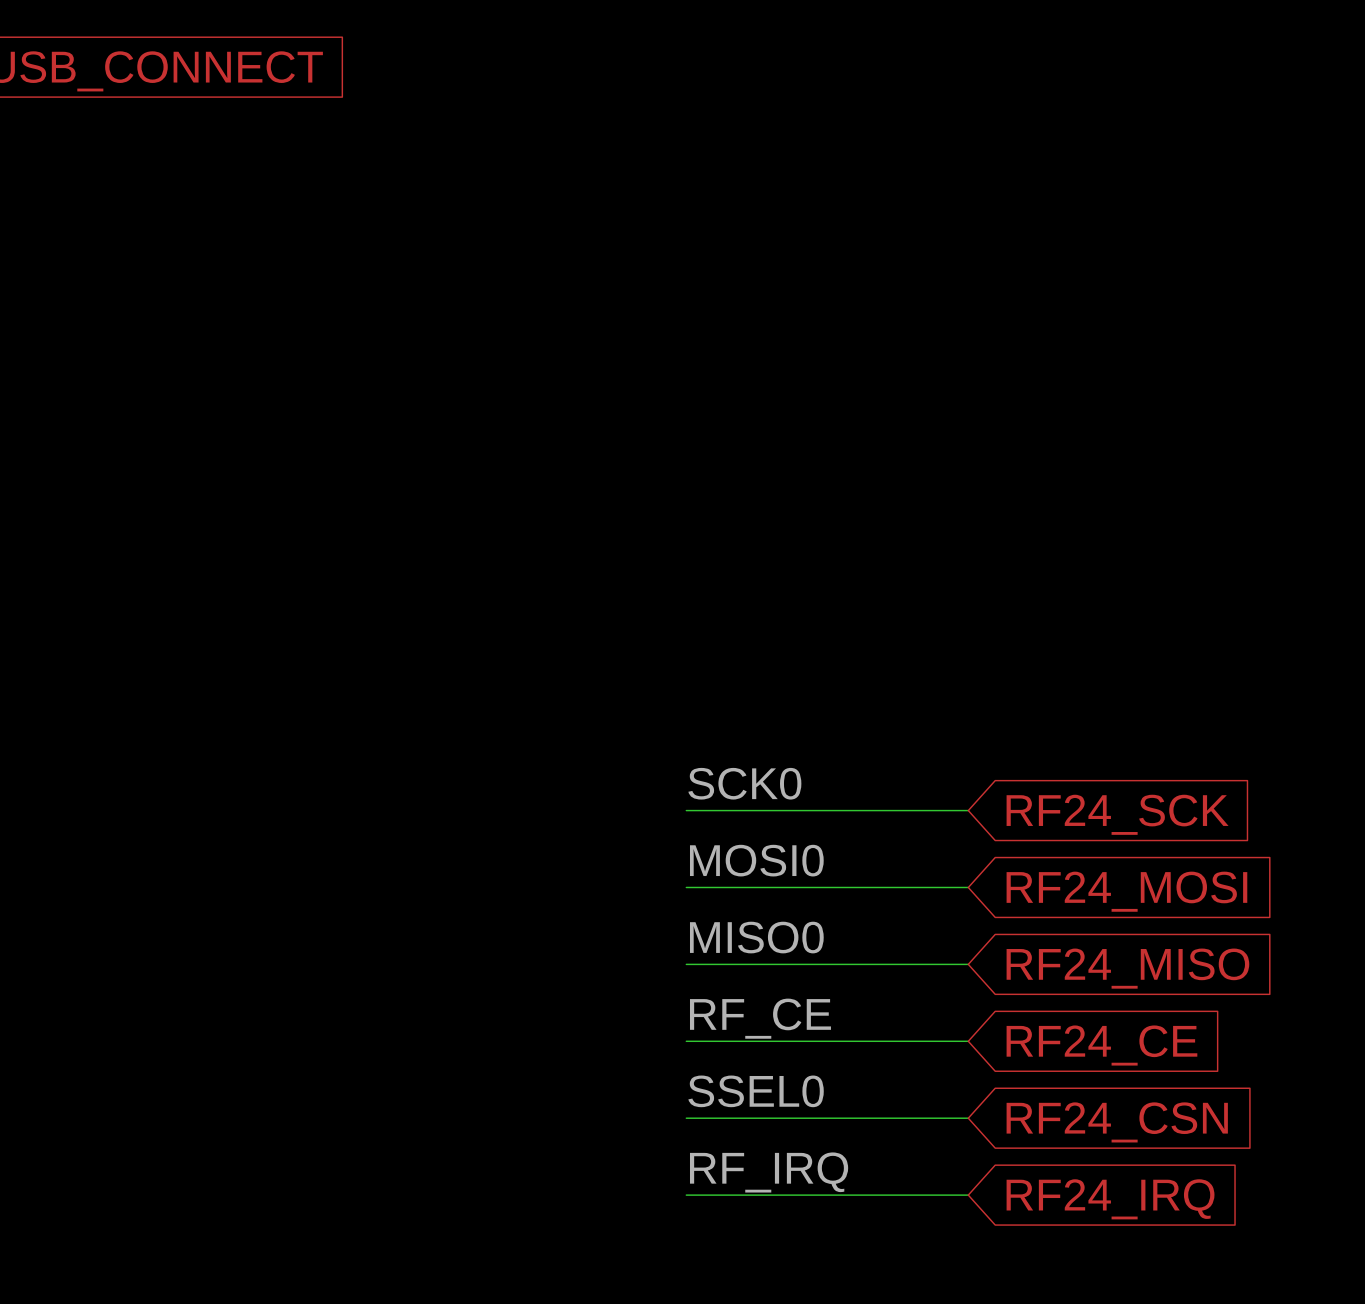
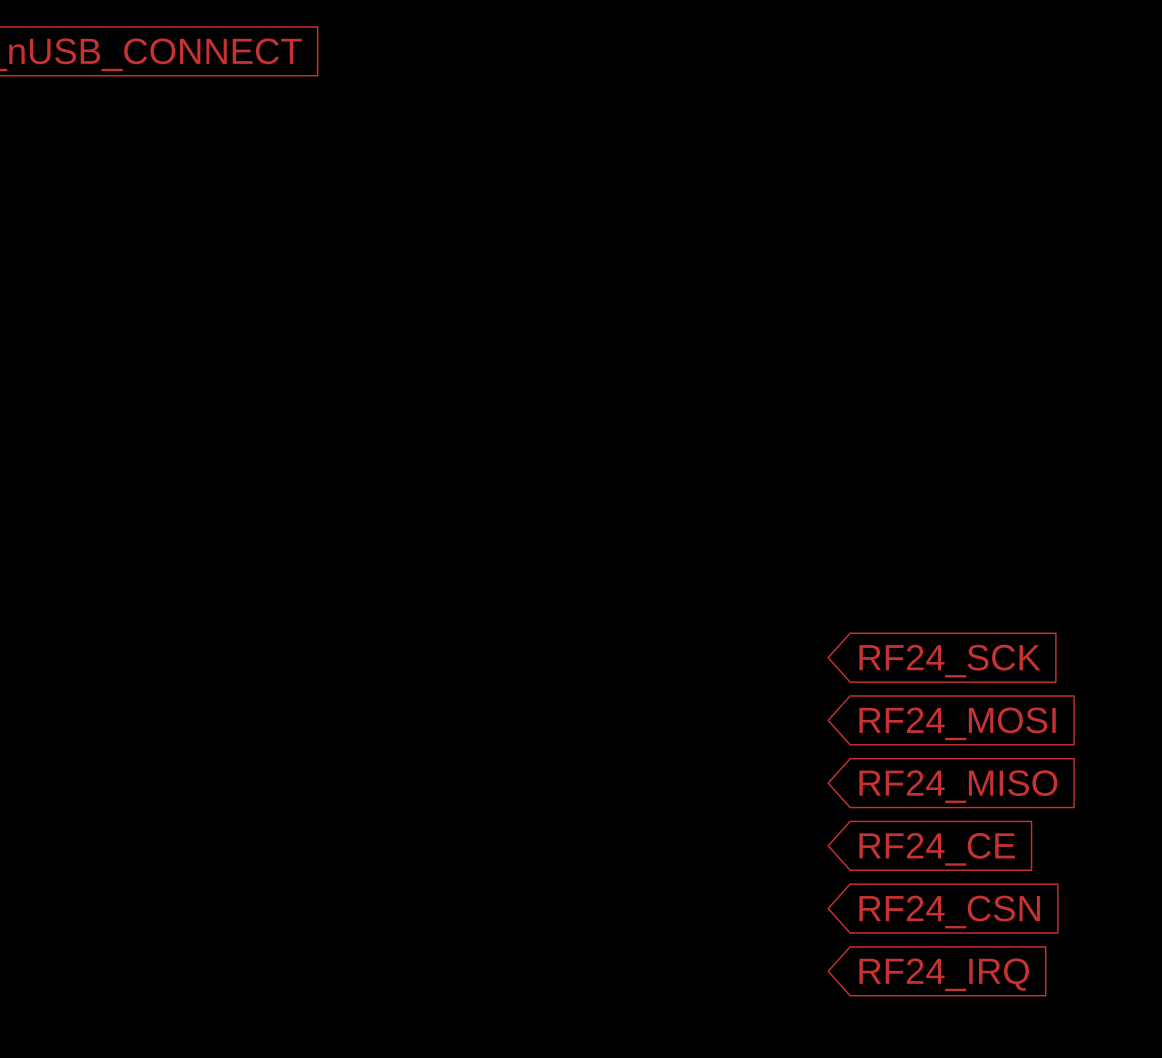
label: SCK0 (744, 783) -> none
wire: (686, 810) (968, 810) -> none
label: MOSI0 (756, 860) -> none
wire: (686, 887) (968, 887) -> none
label: MISO0 (756, 937) -> none
wire: (686, 964) (968, 964) -> none
label: RF_CE (760, 1018) -> none
wire: (686, 1041) (968, 1041) -> none
label: SSEL0 (756, 1091) -> none
wire: (686, 1118) (968, 1118) -> none
label: RF_IRQ (769, 1172) -> none
wire: (686, 1195) (968, 1195) -> none

